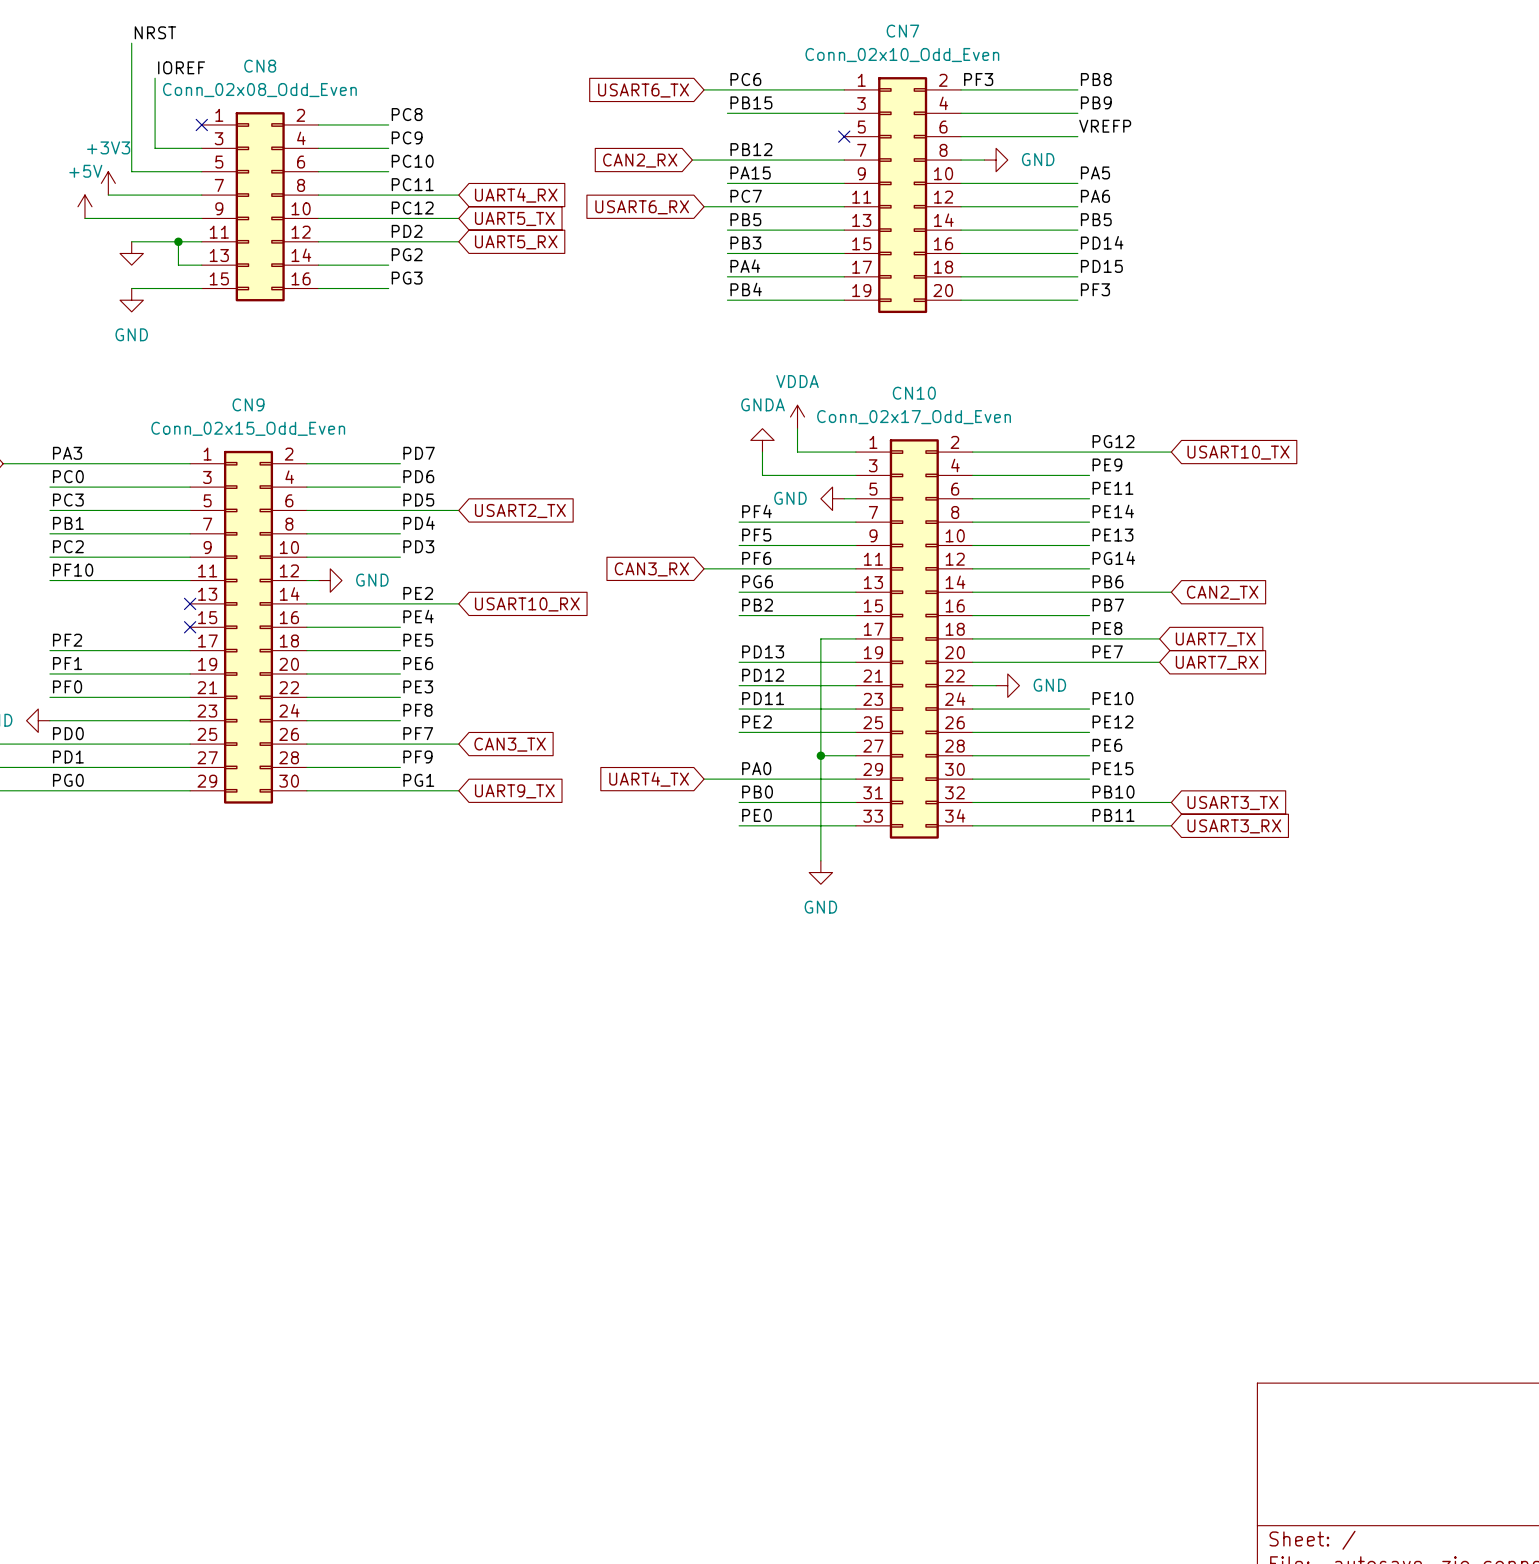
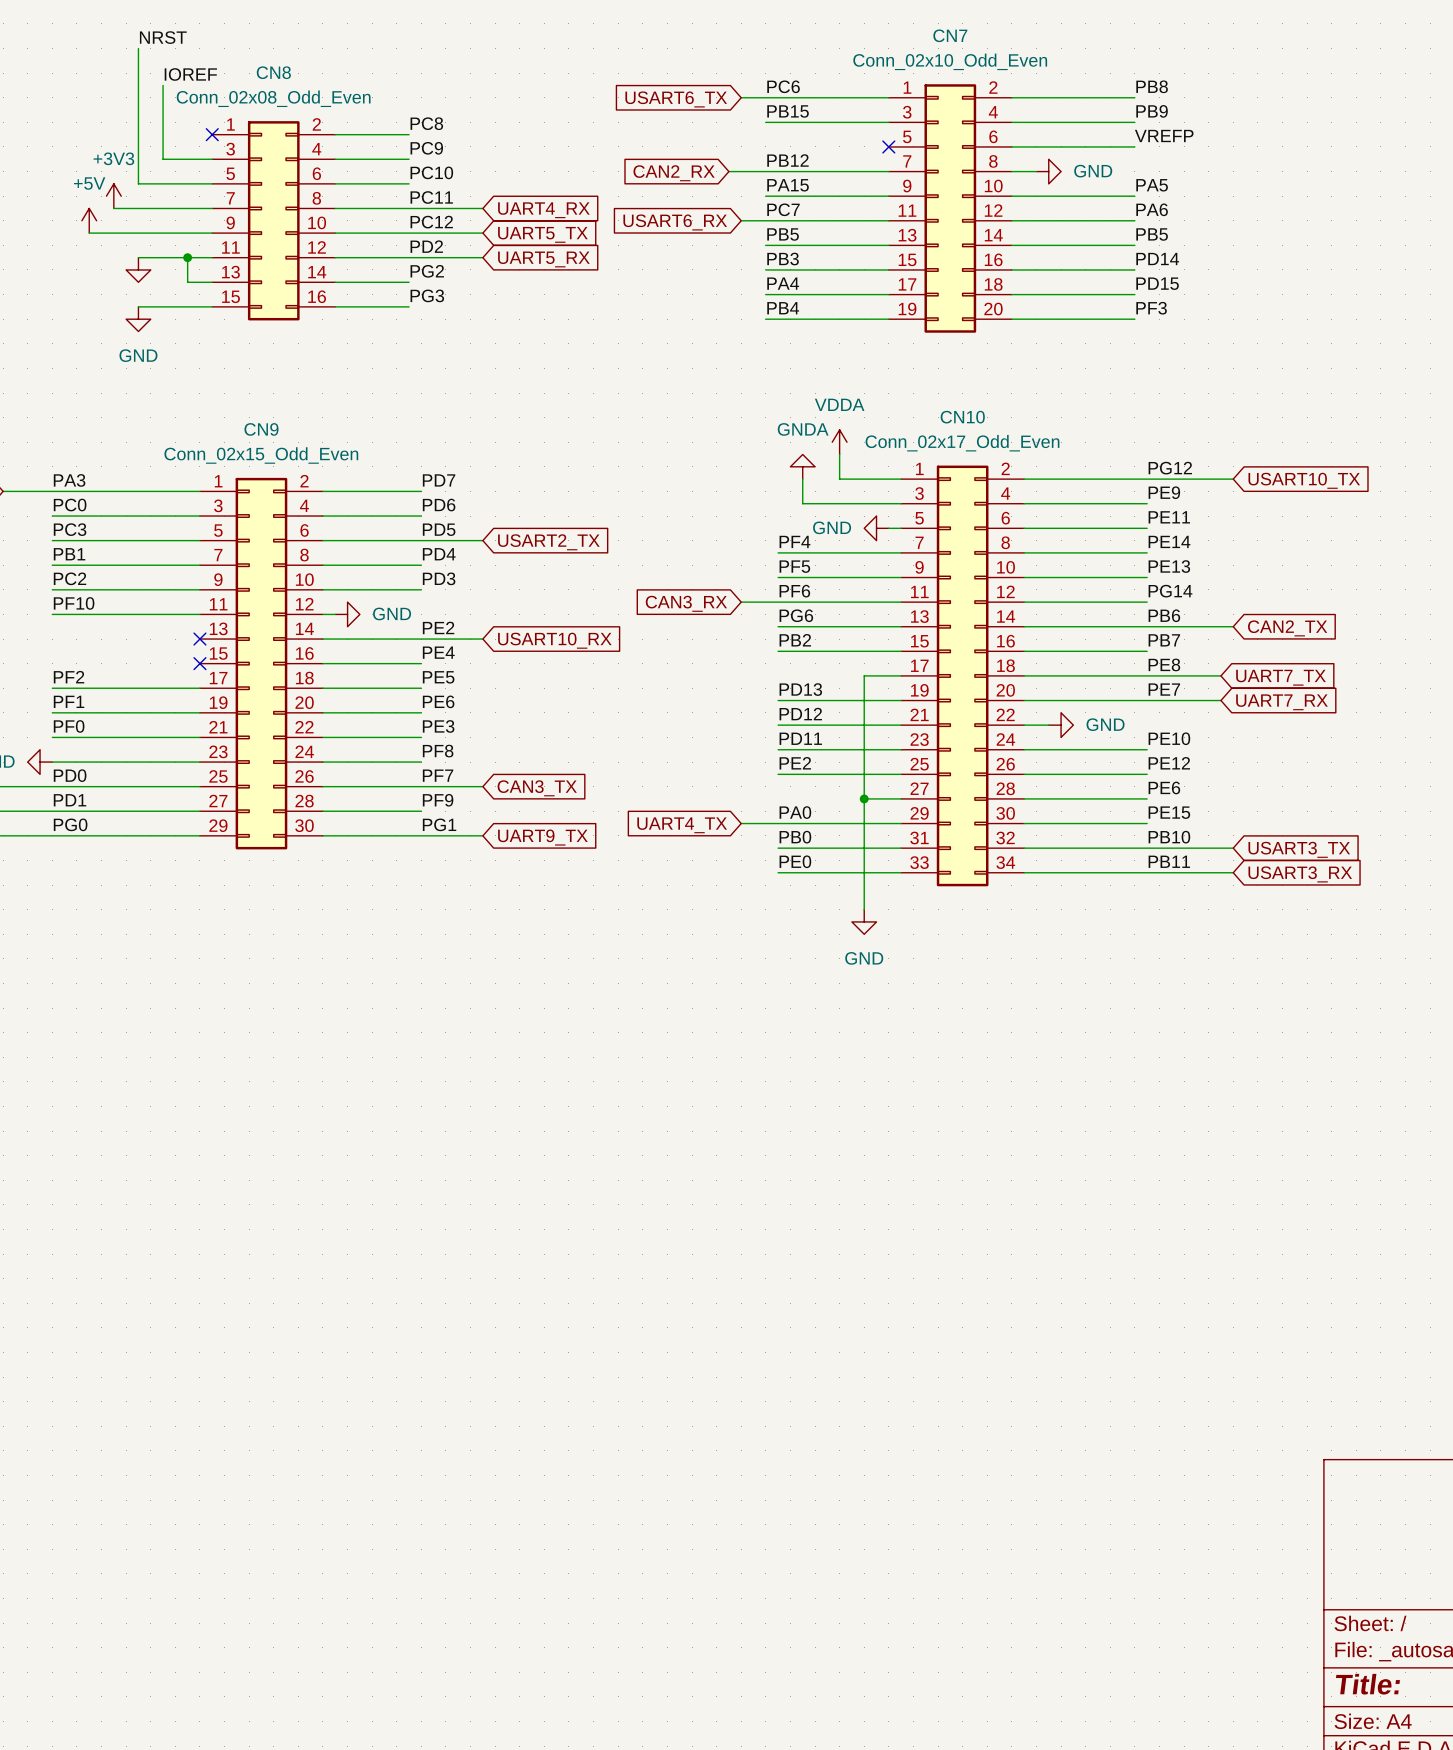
label: PF3 (978, 79) -> none

